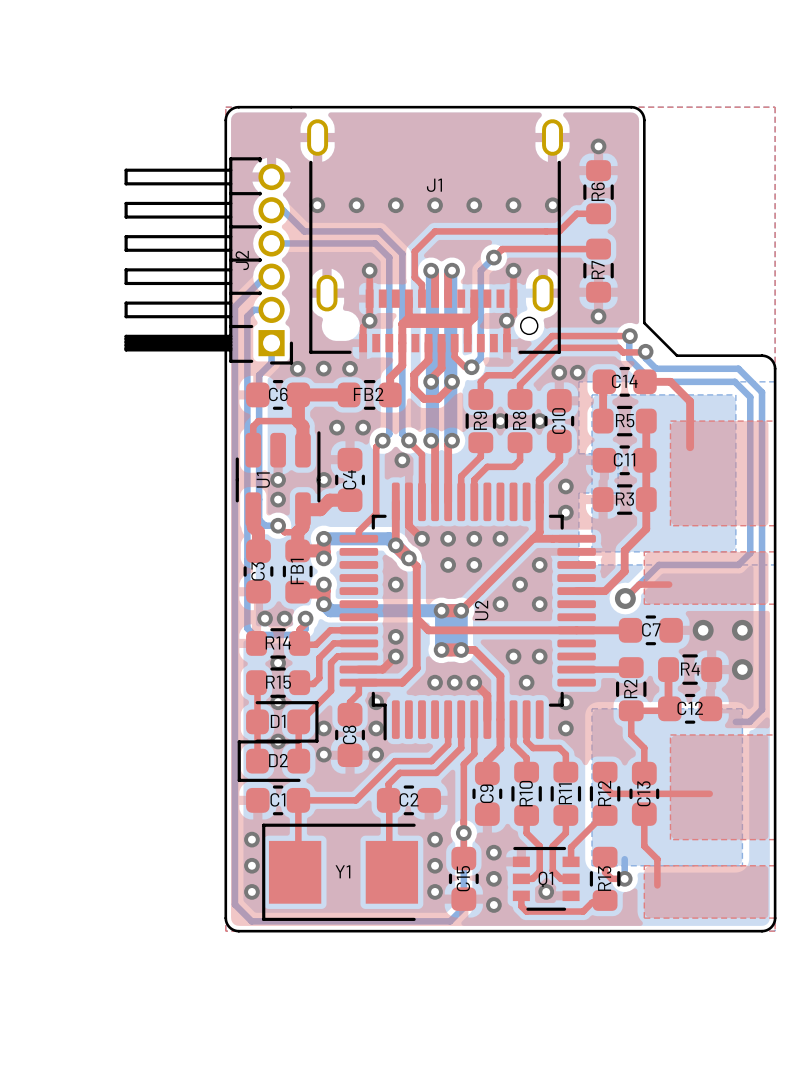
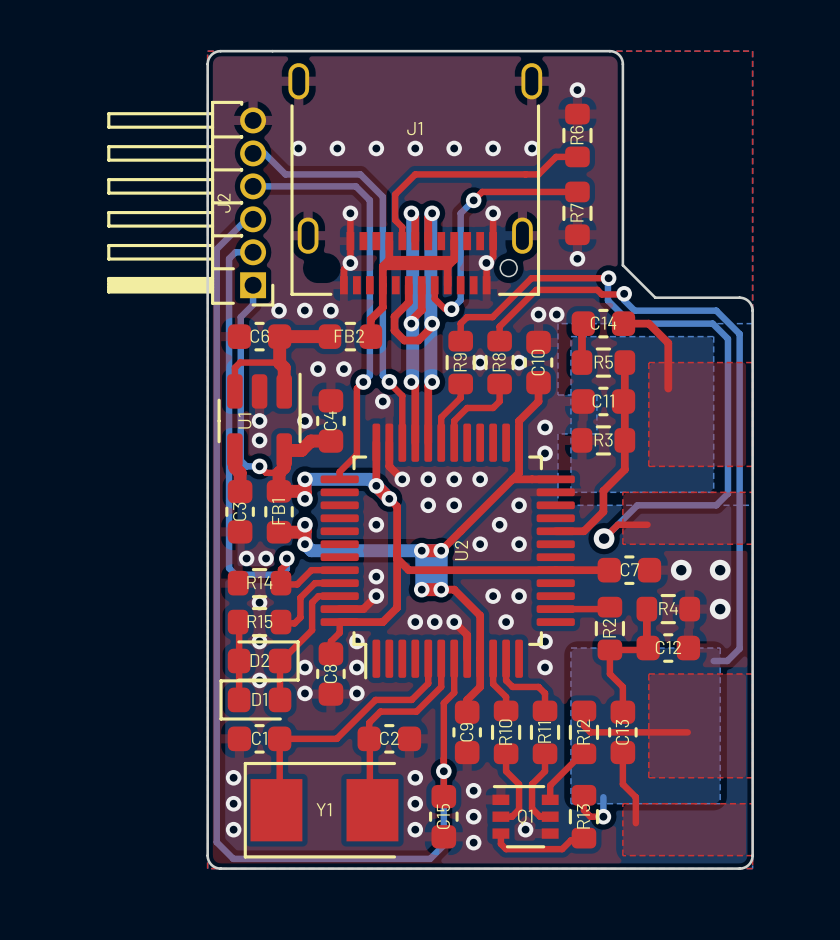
D1 name position: D1 (278, 721) -> D1 (259, 699)
D2 name position: D2 (278, 760) -> D2 (259, 660)

